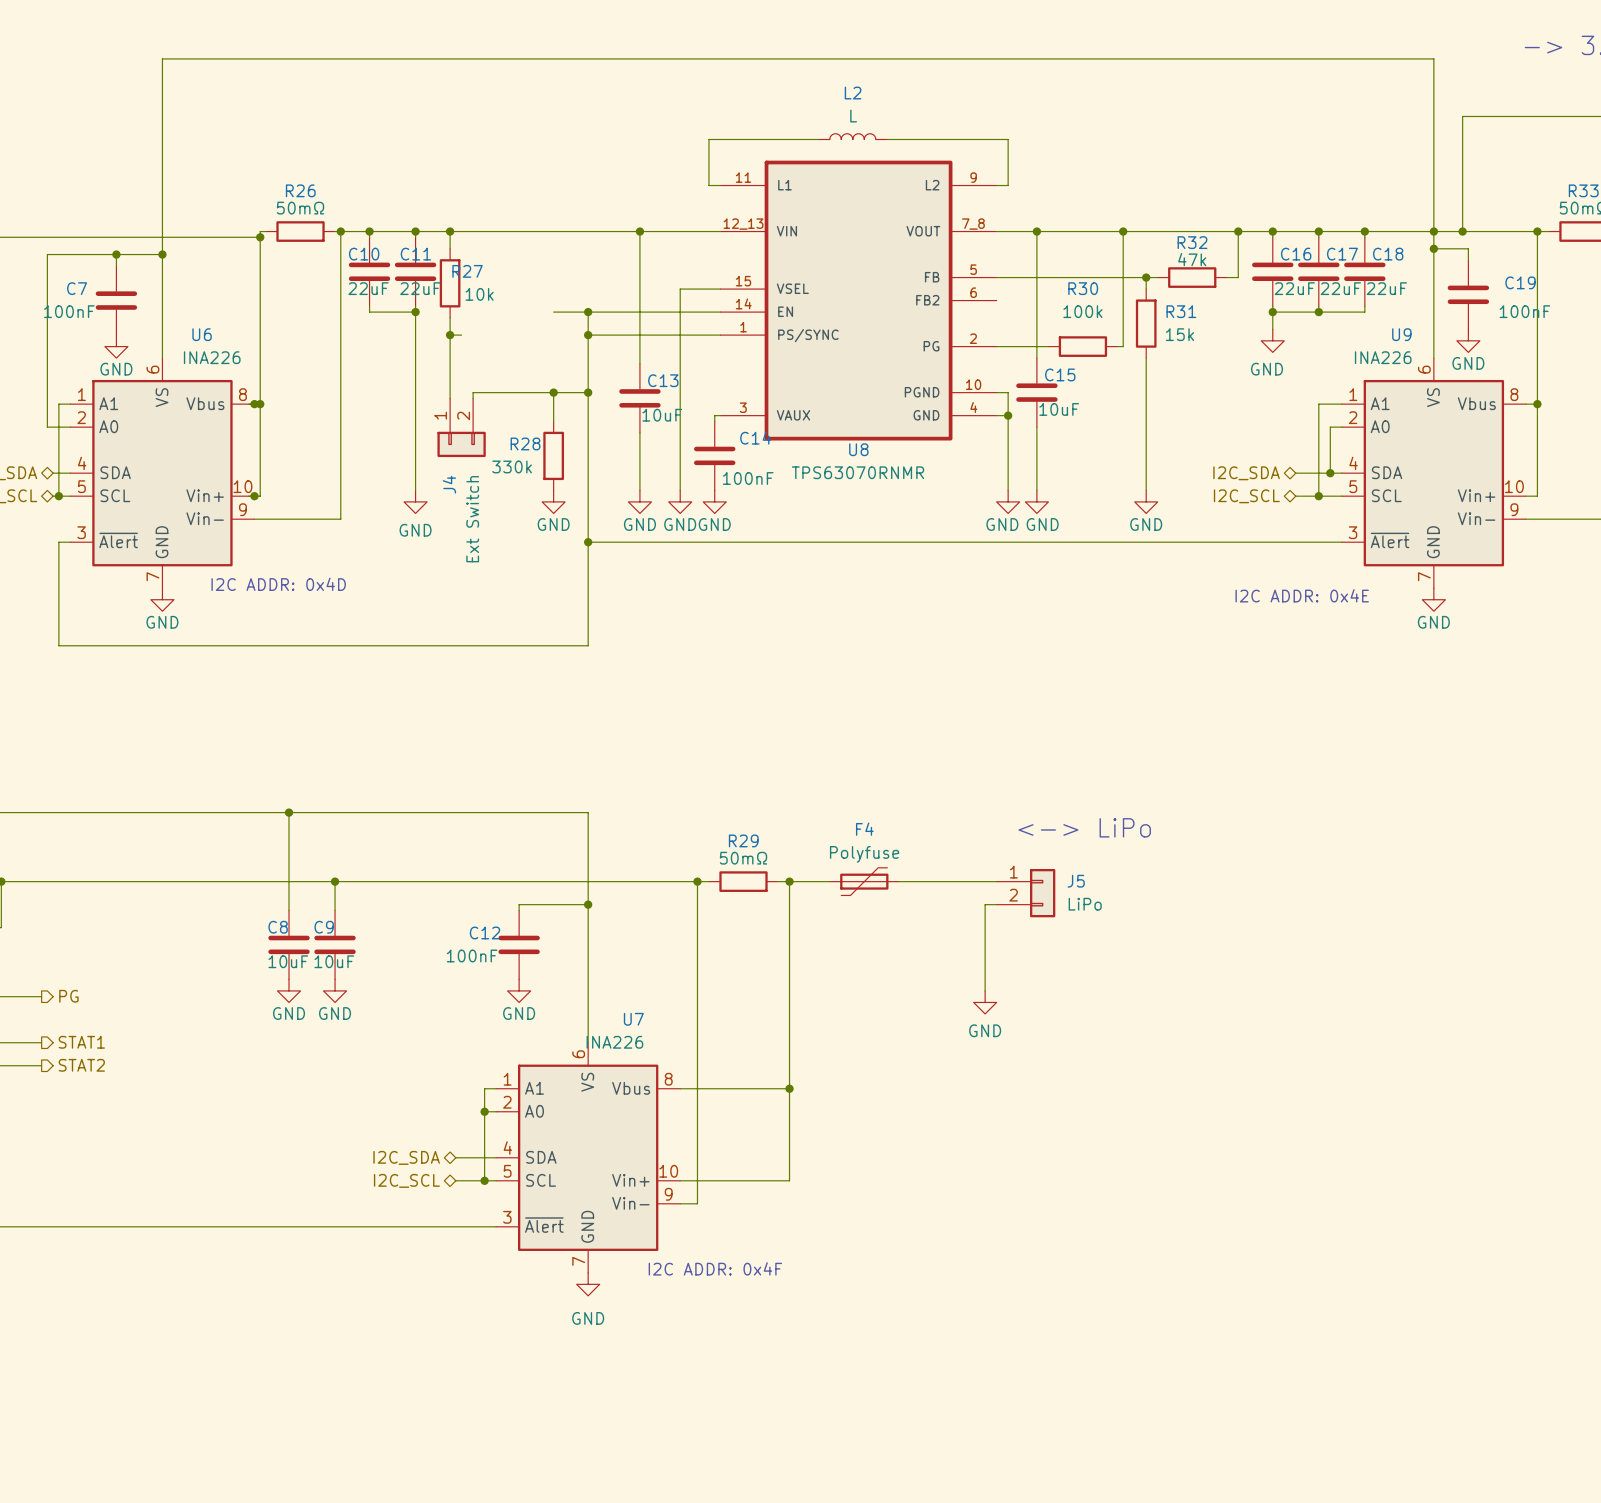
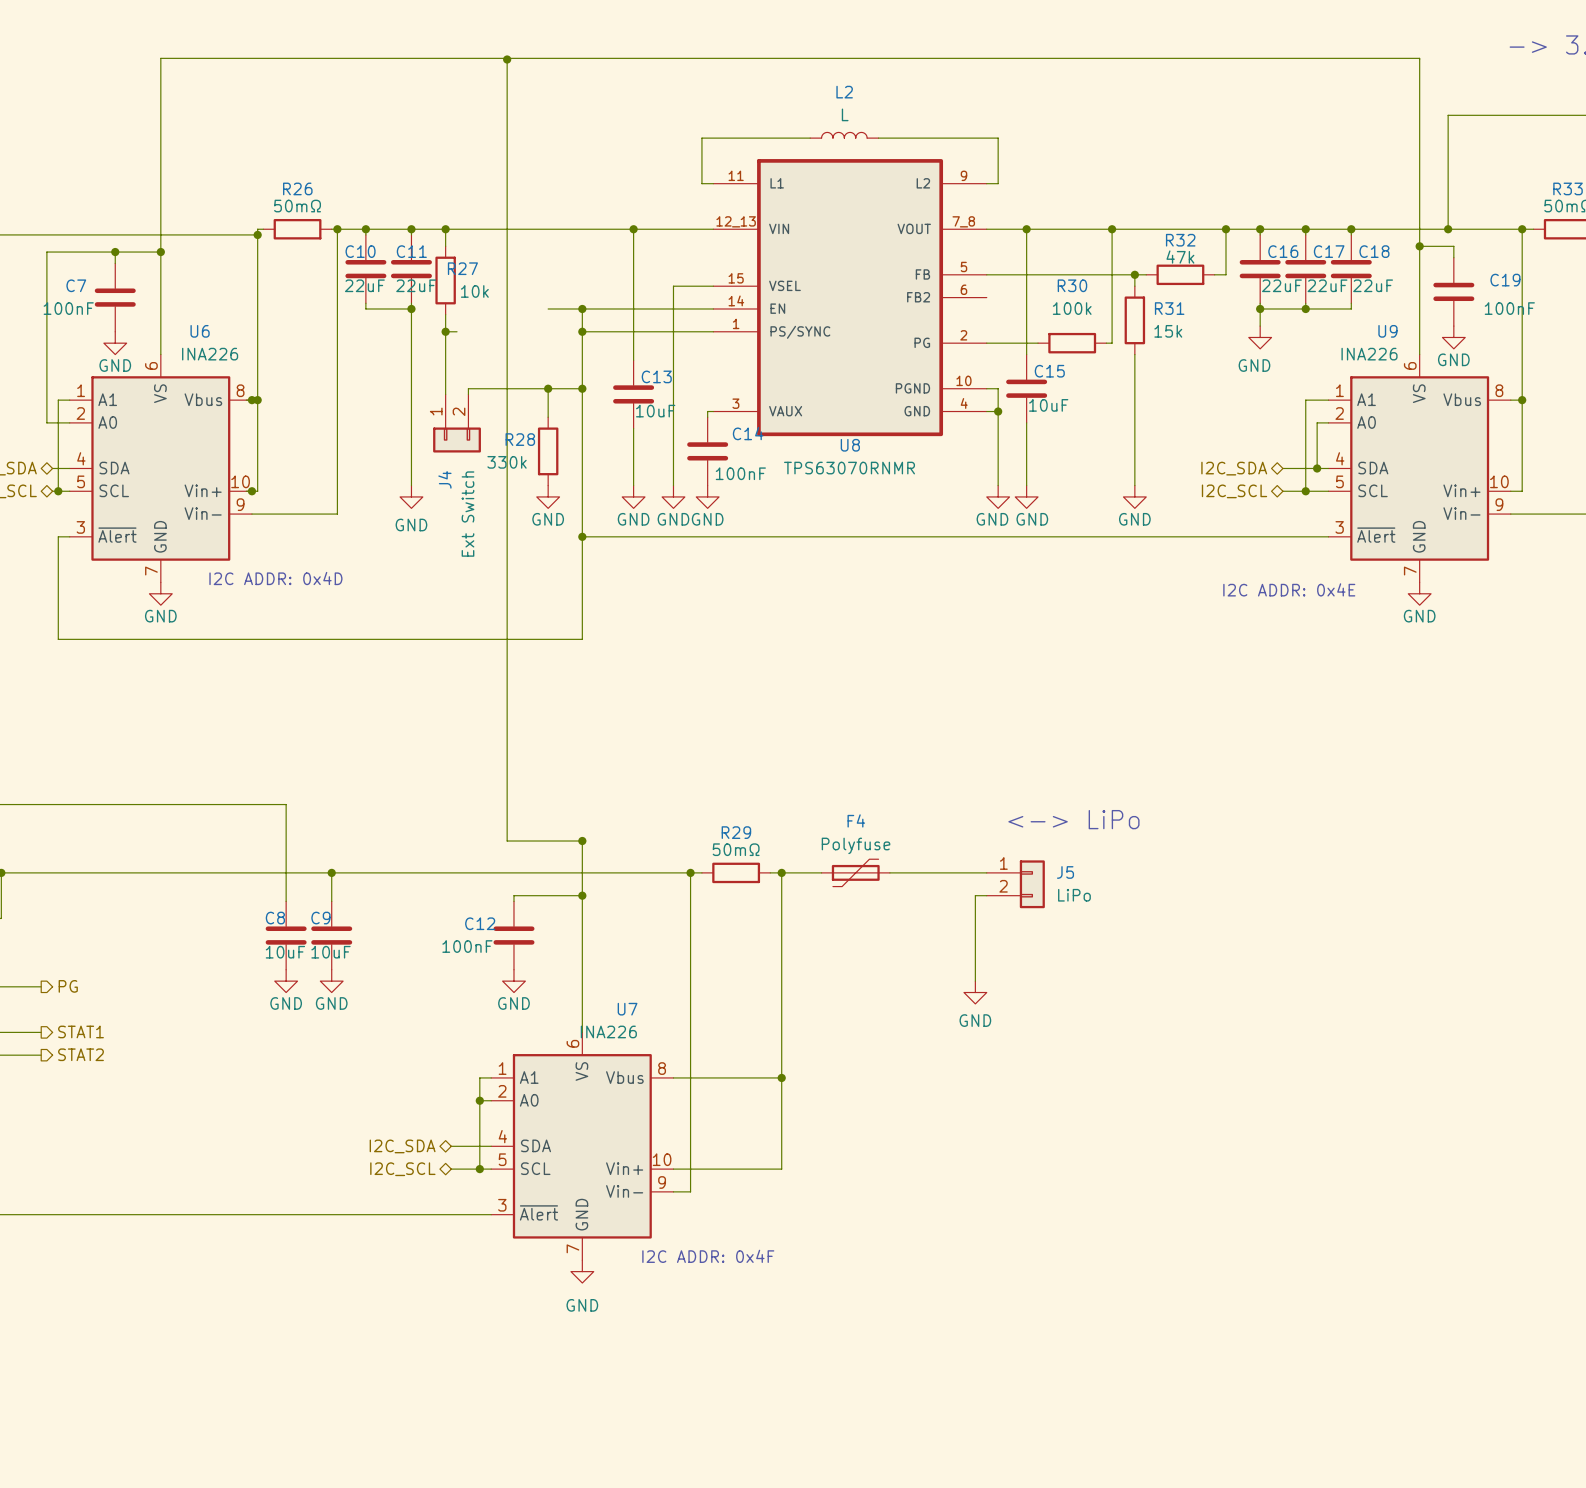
wire: none -> (507, 59) (507, 841) (583, 841)
junction: none -> (507, 59)
junction: (1433, 231) -> none
wire: (289, 812) (588, 812) (588, 849) -> none
junction: (289, 812) -> none
junction: none -> (582, 841)

